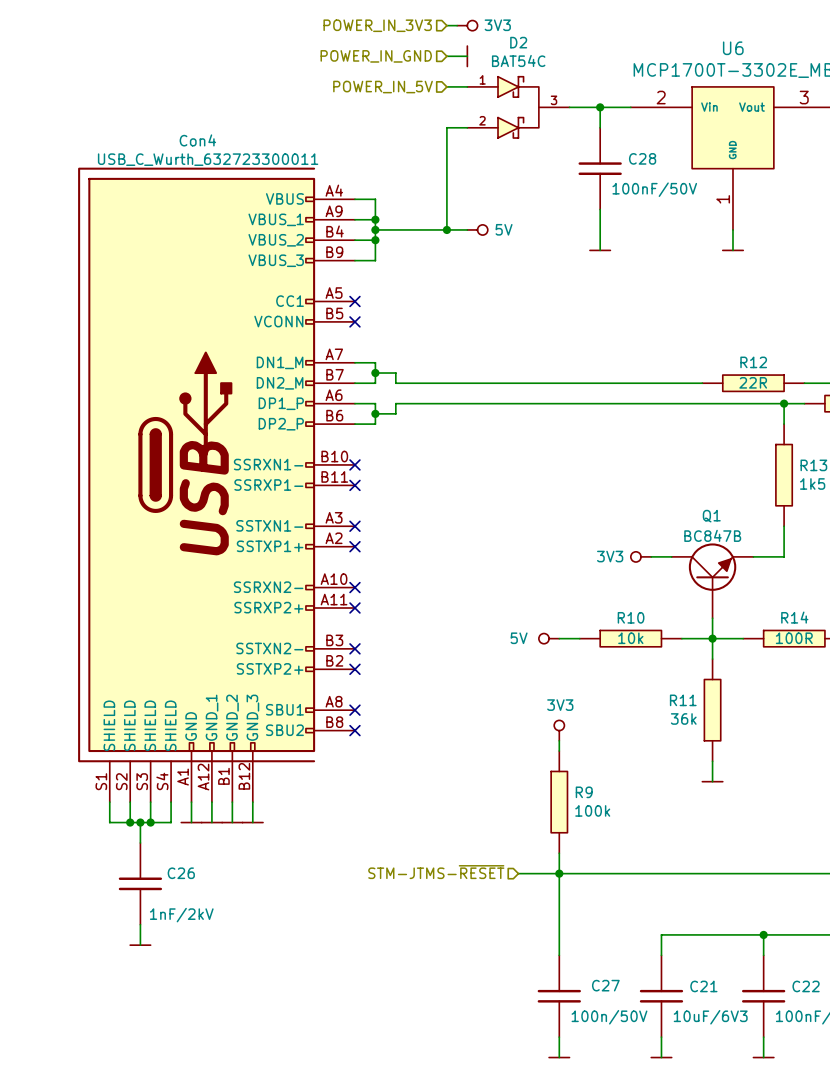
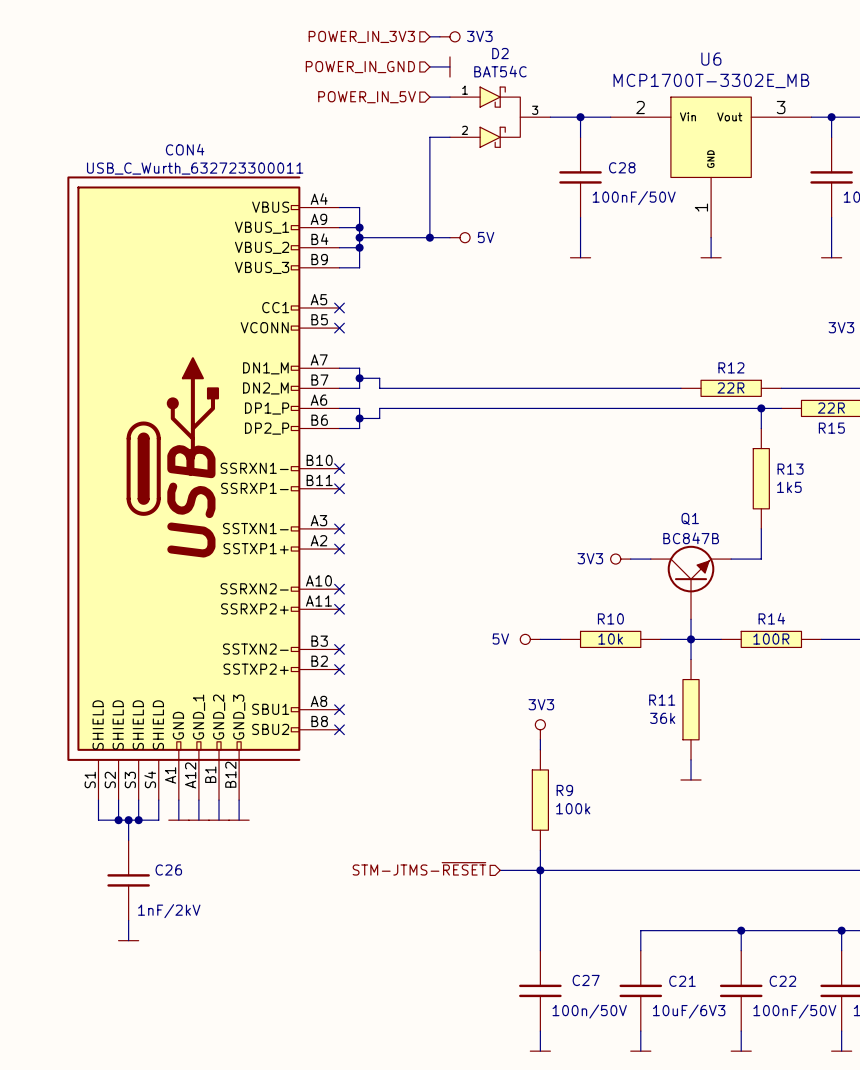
Con4 name: Con4 (197, 140) -> CON4 (185, 149)

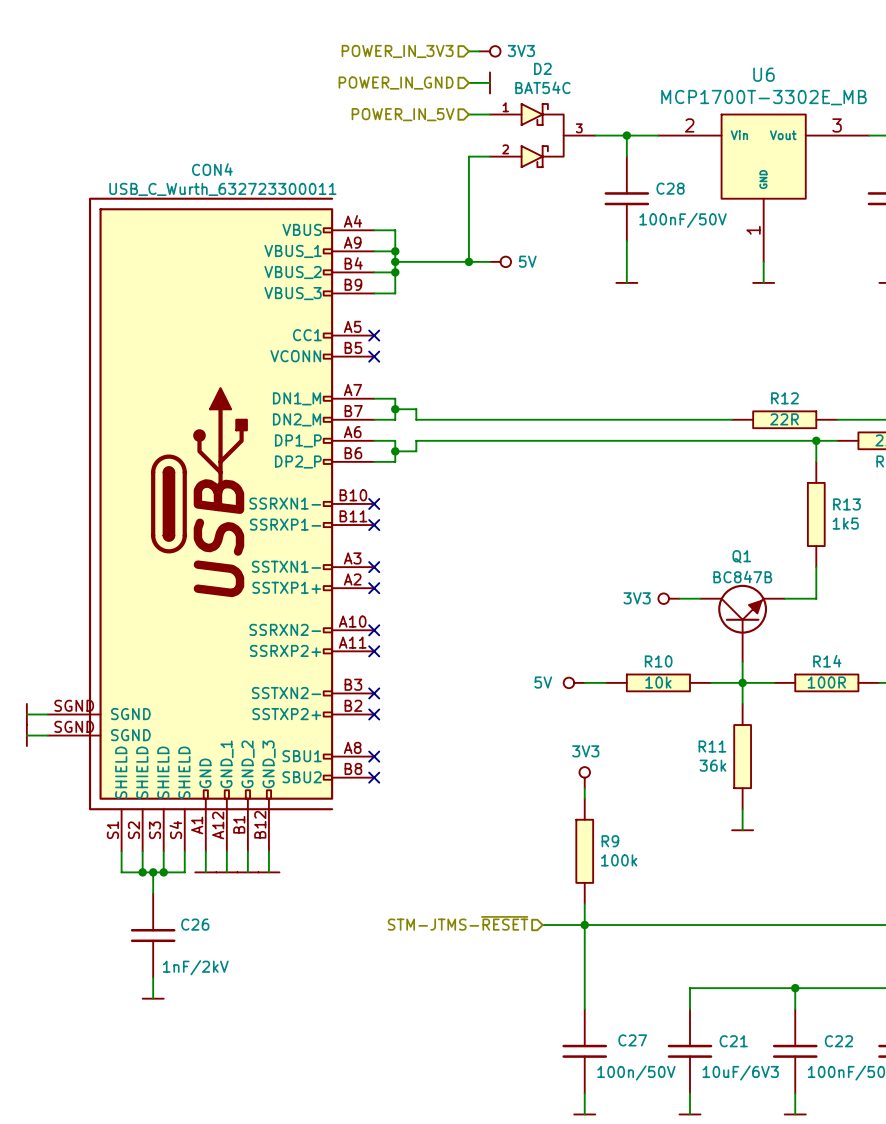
CON4 symbol: [67, 176, 340, 801] -> [47, 197, 375, 852]
wire: none -> (26, 714) (47, 714)
power symbol: none -> (26, 714)
wire: none -> (26, 735) (47, 735)
power symbol: none -> (26, 735)

